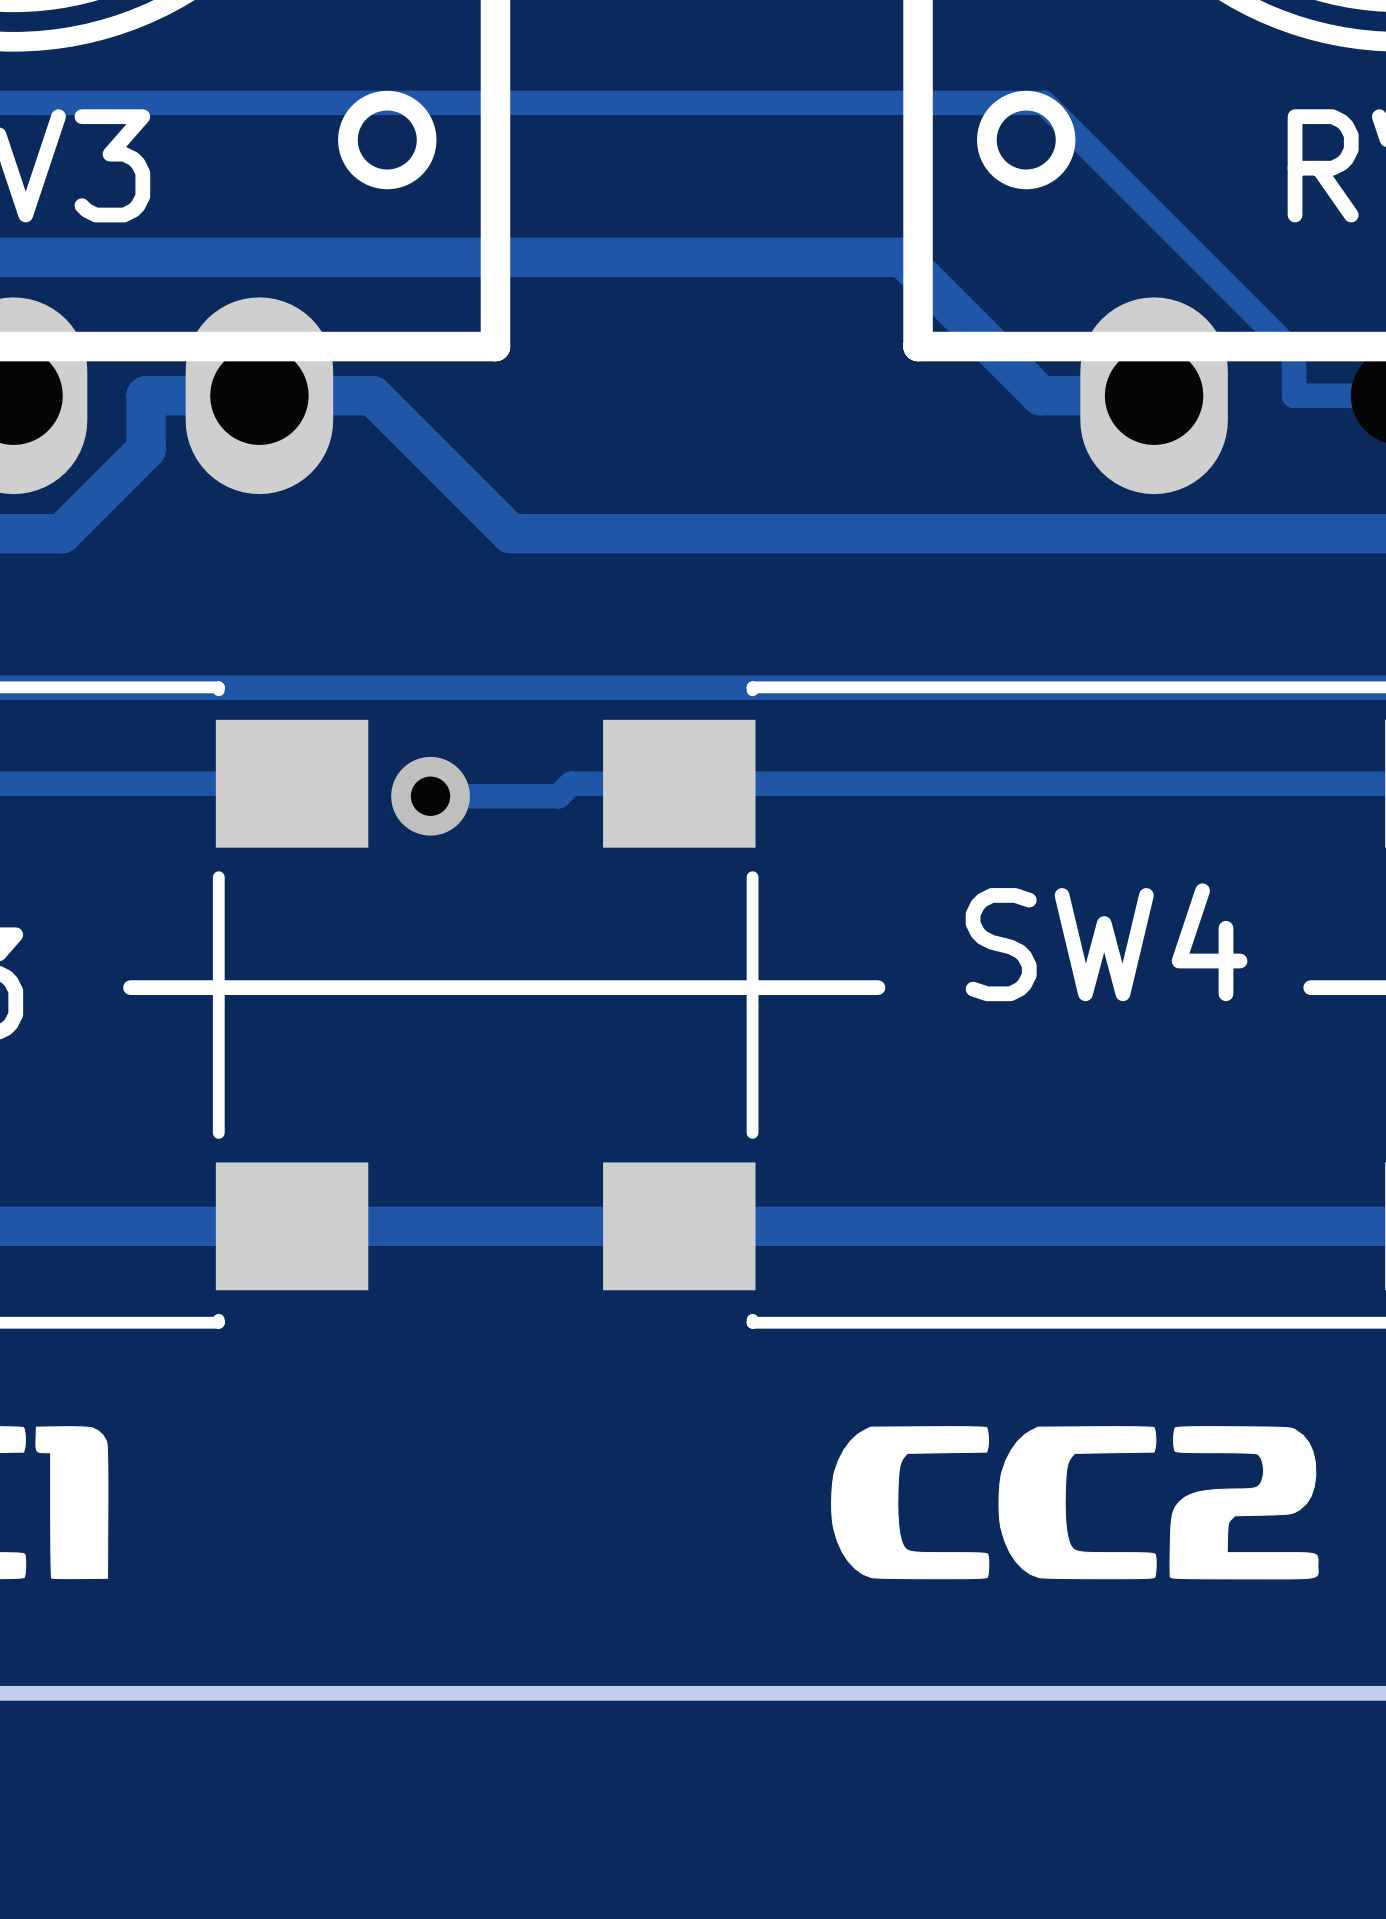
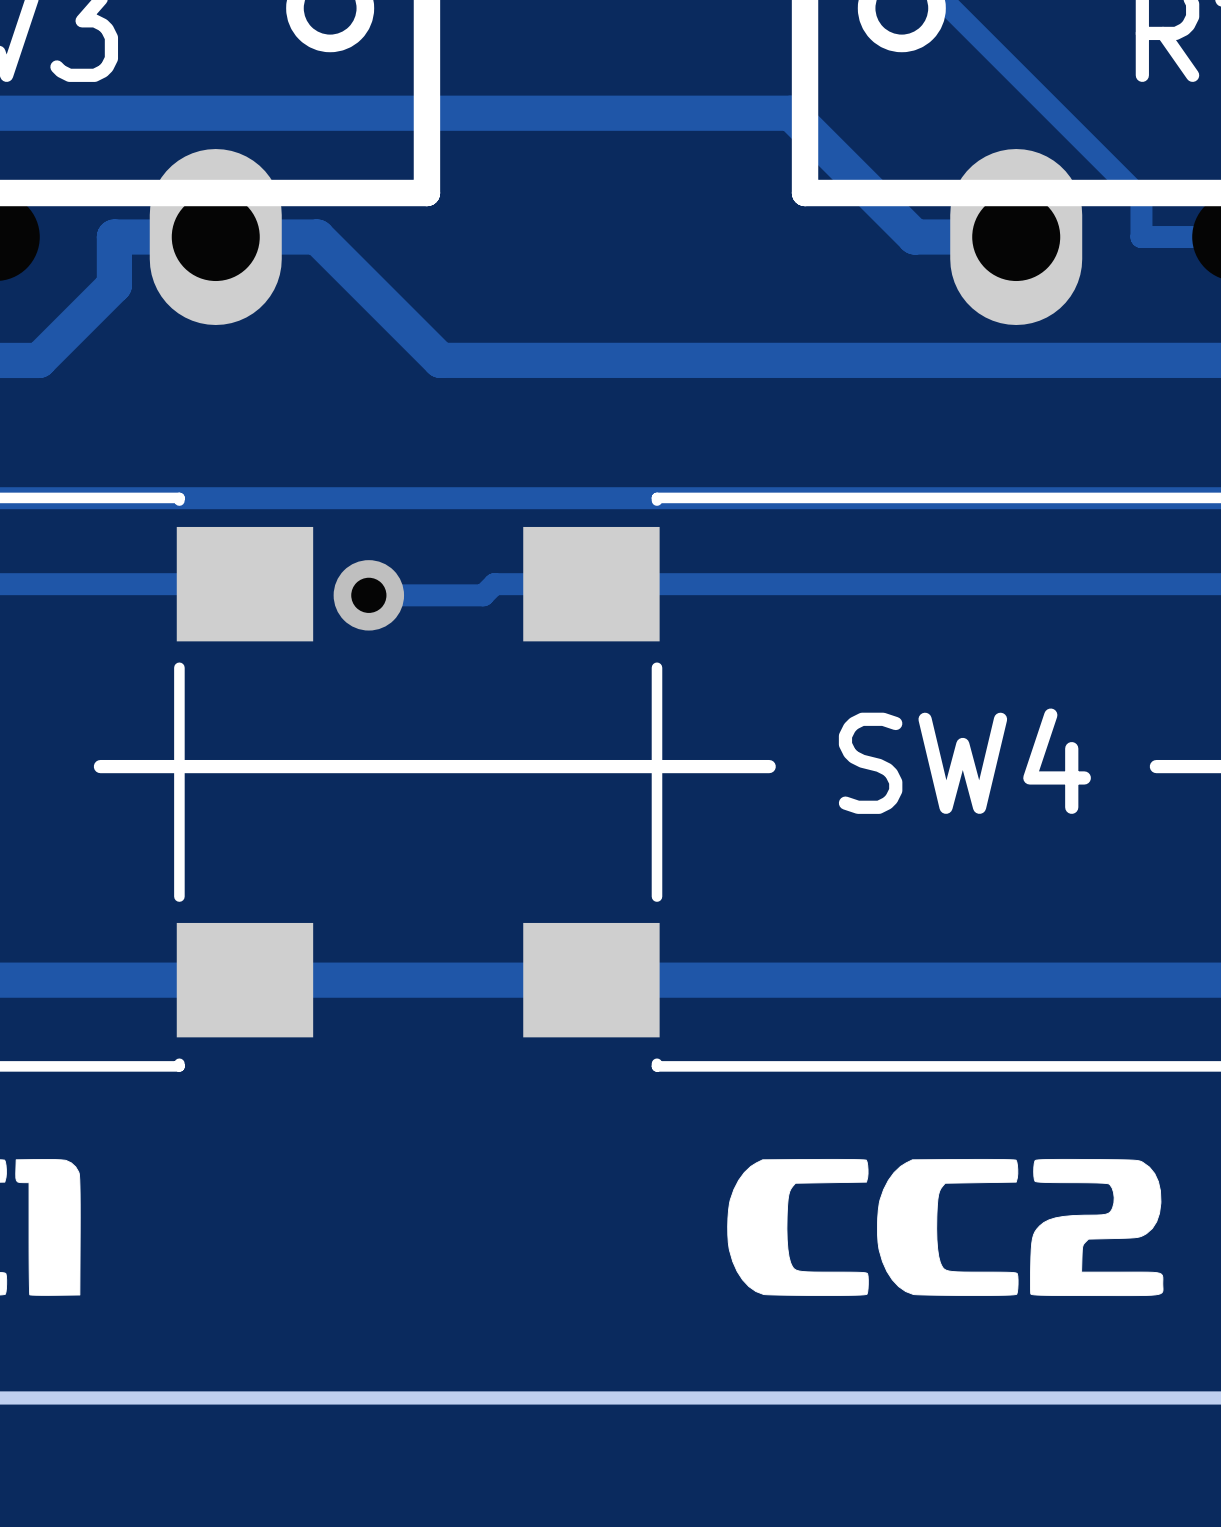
SW4 name position: SW4 (1106, 942) -> SW4 (964, 761)

